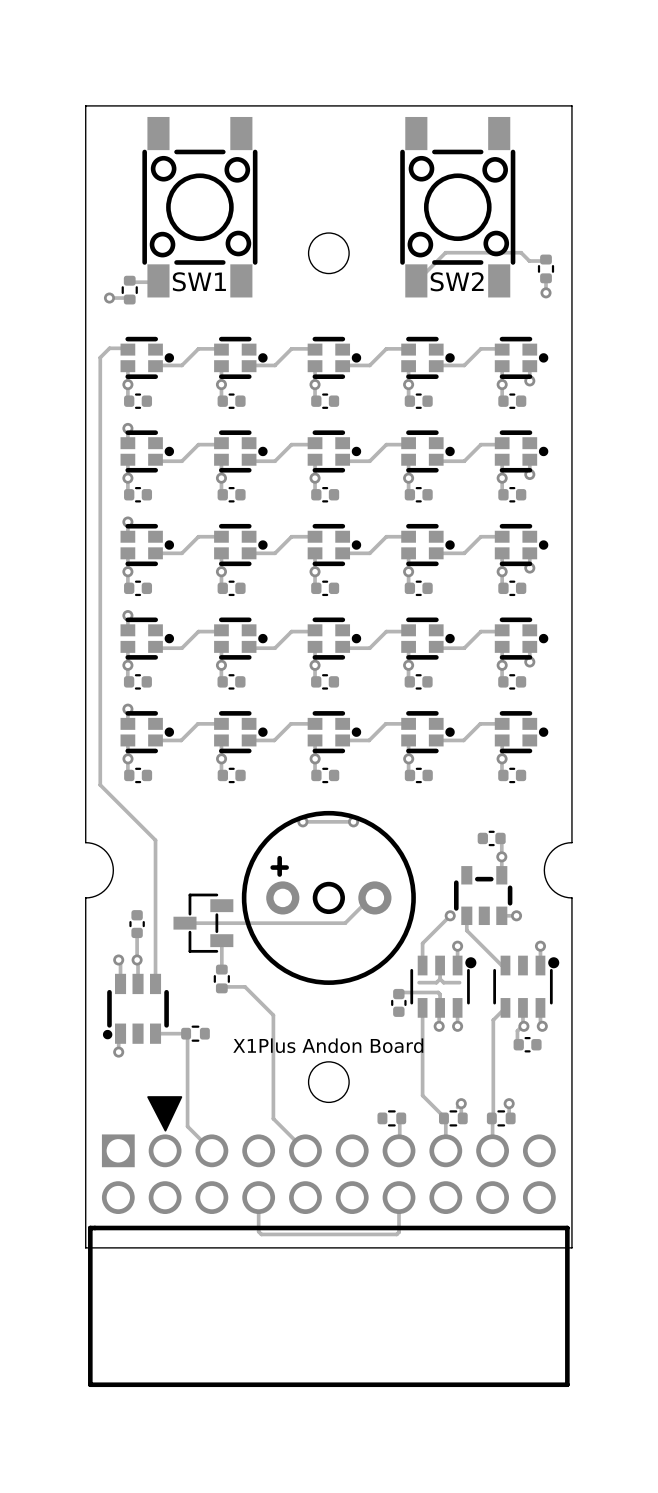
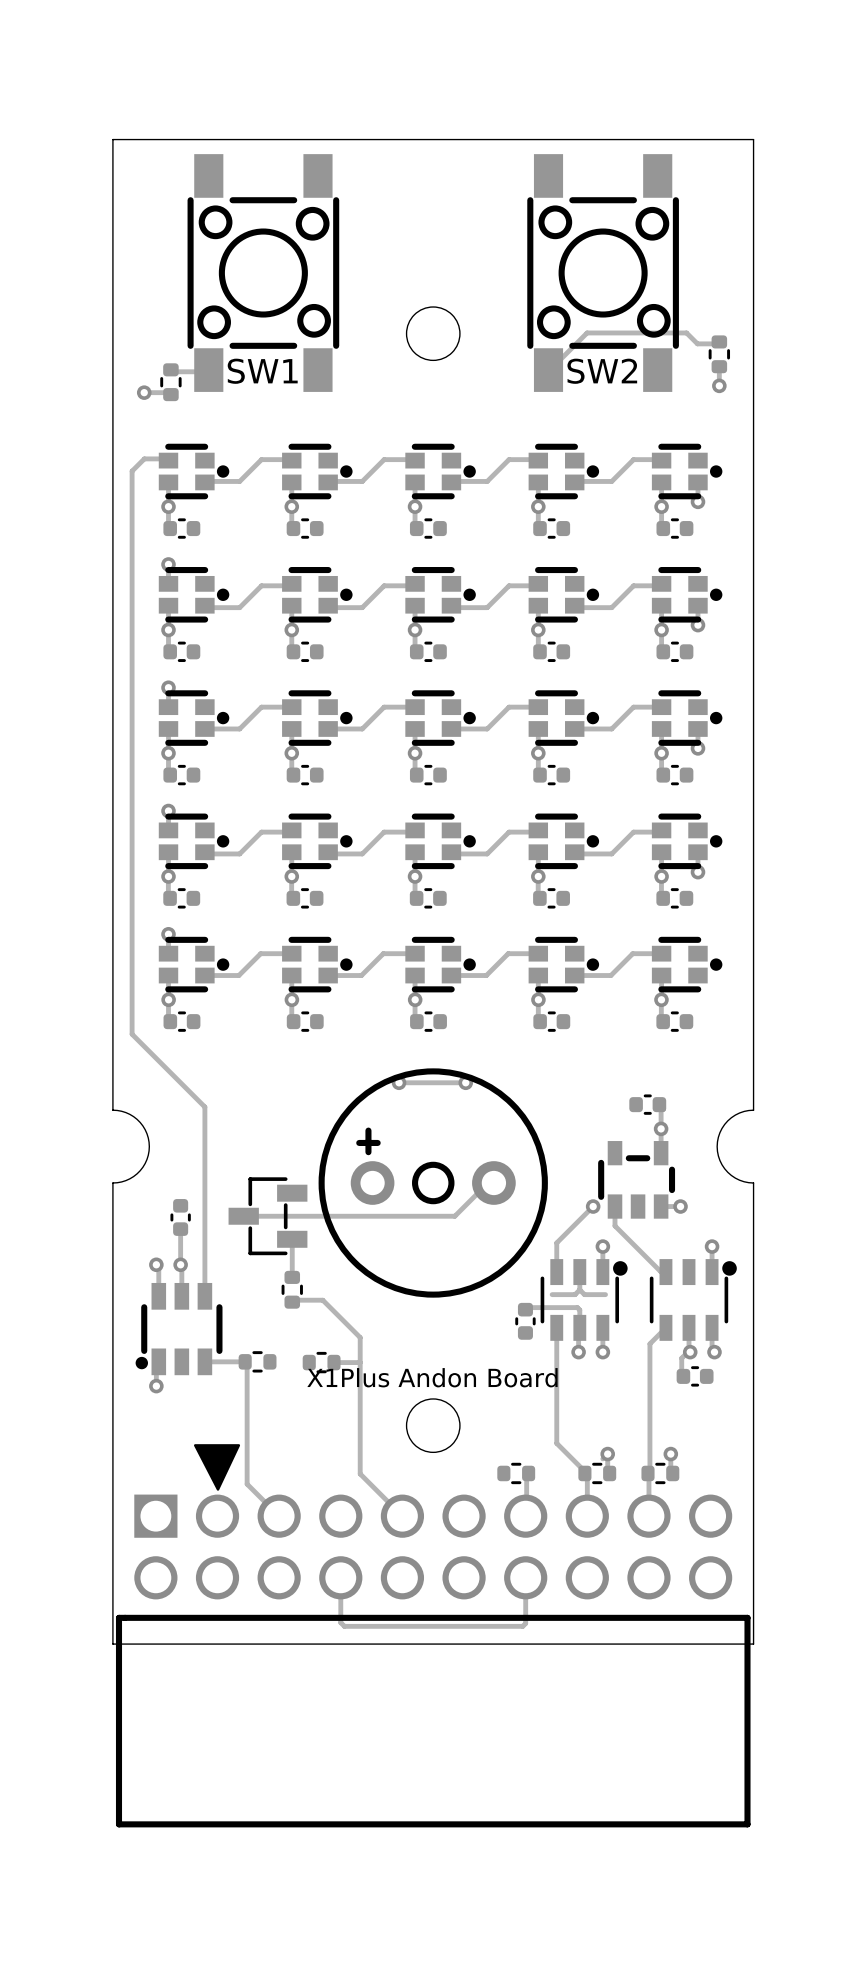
part: none -> (321, 1362)
track: none -> (333, 1362) (360, 1362)

